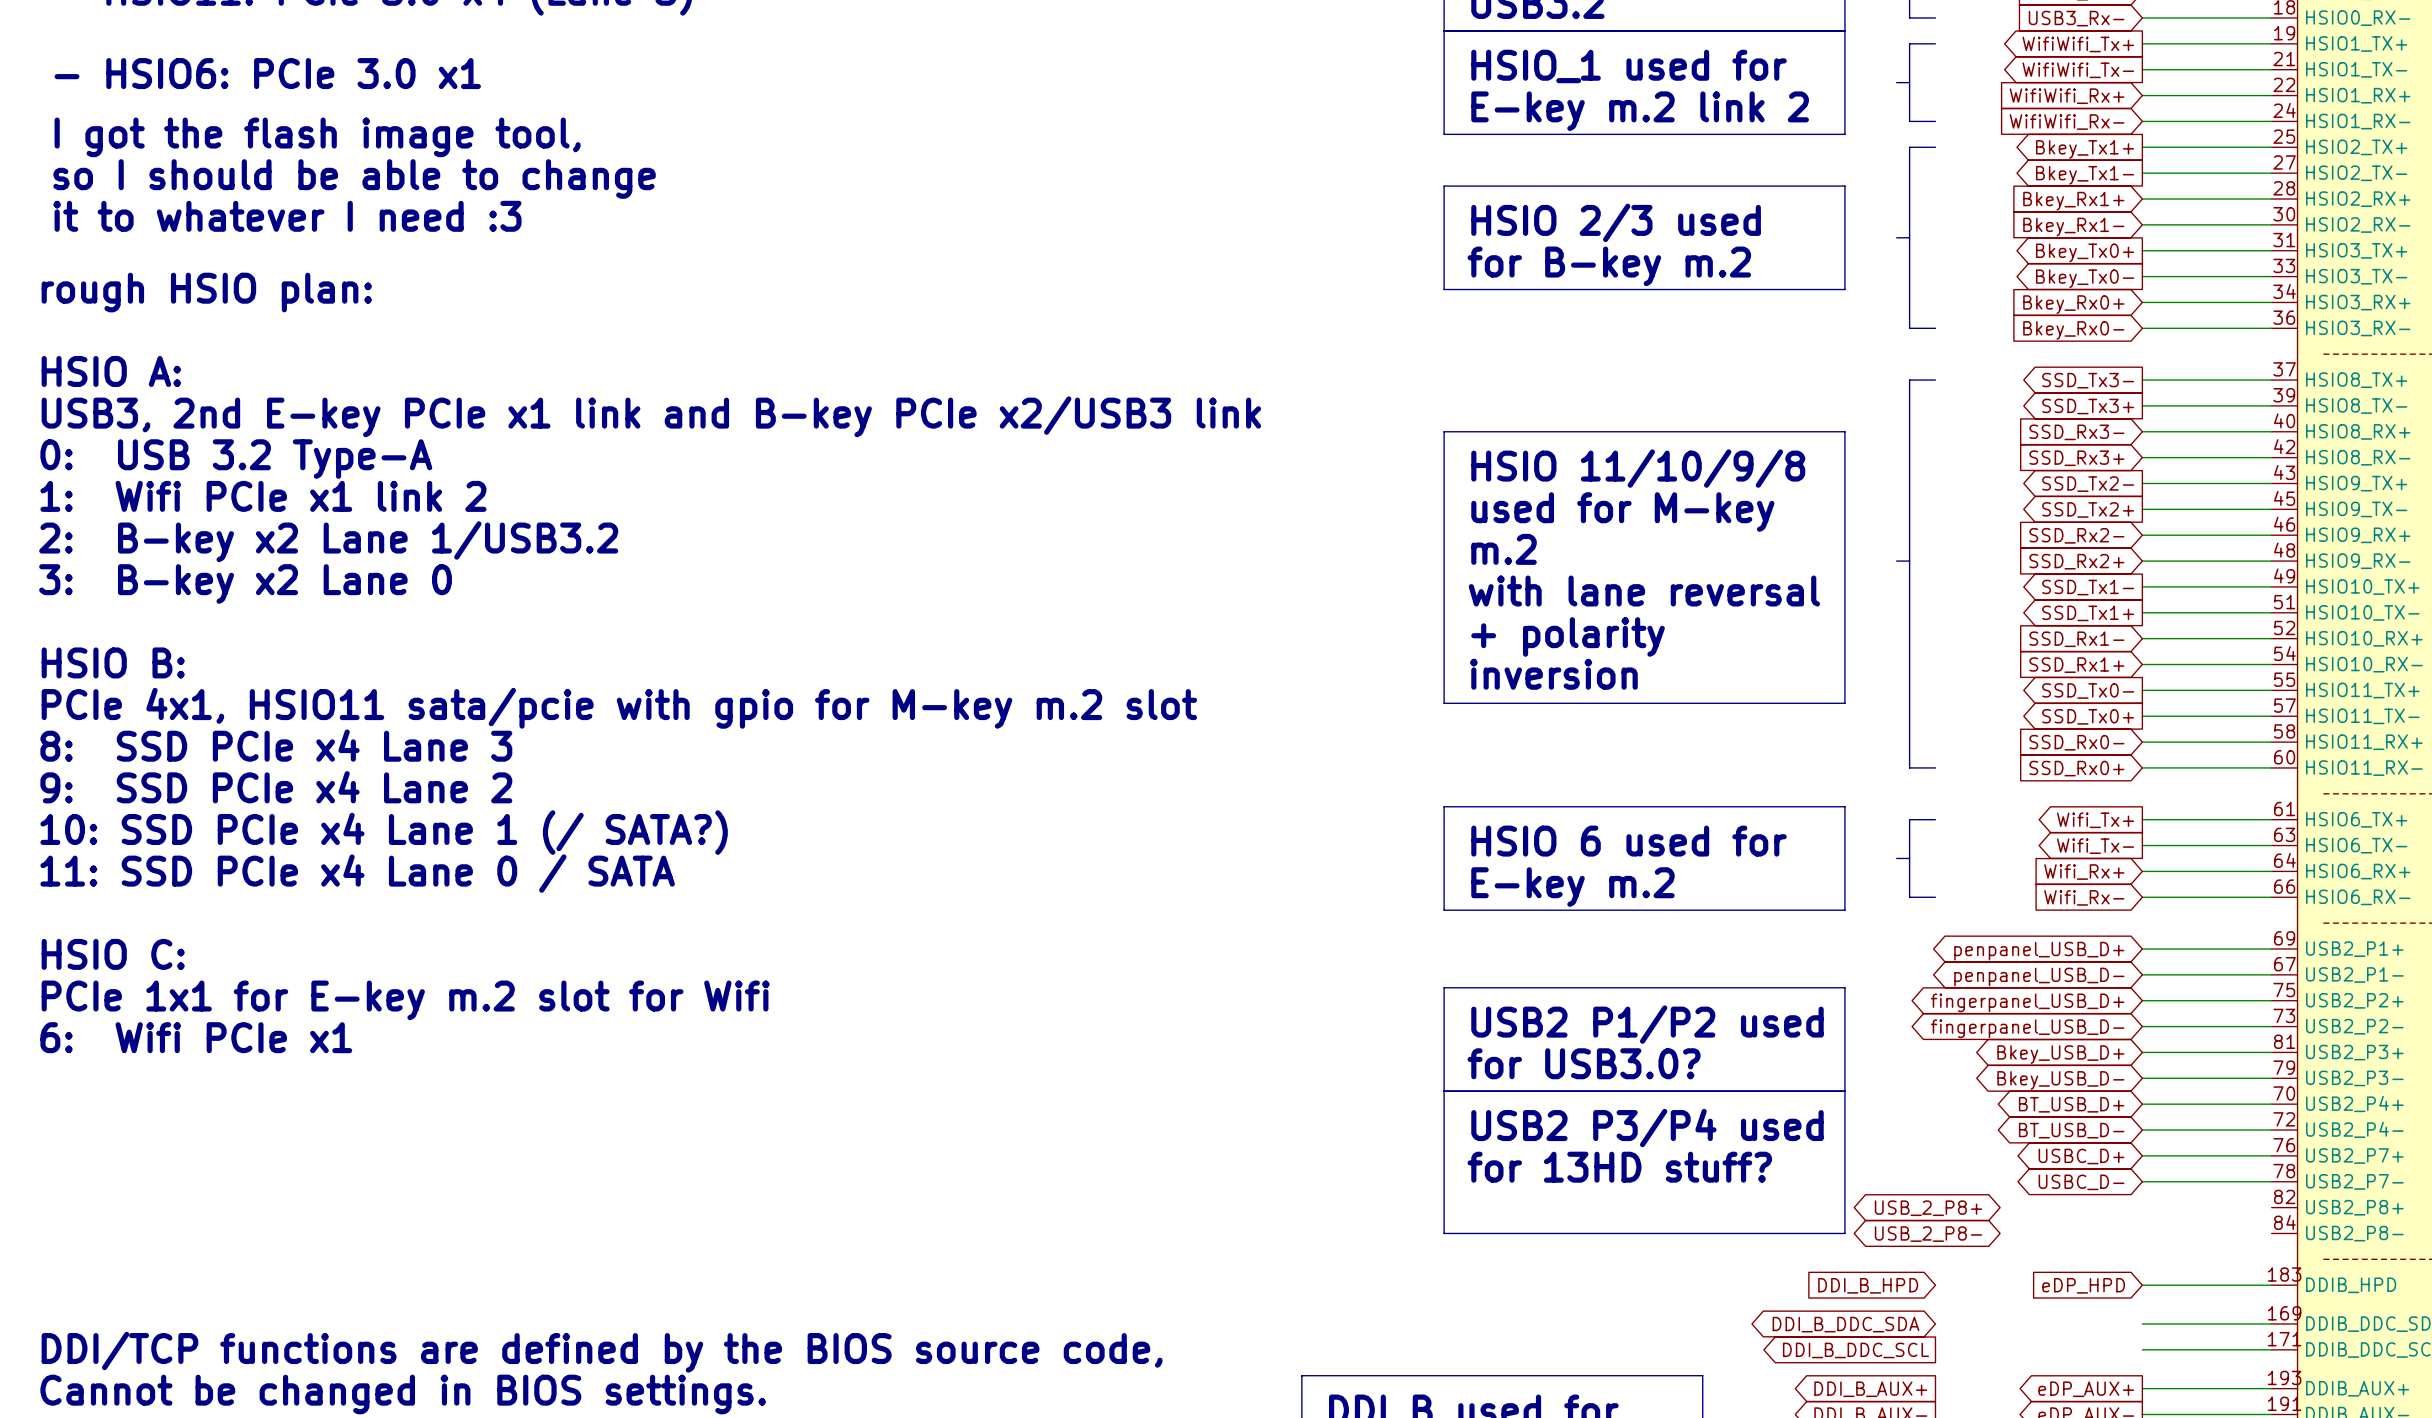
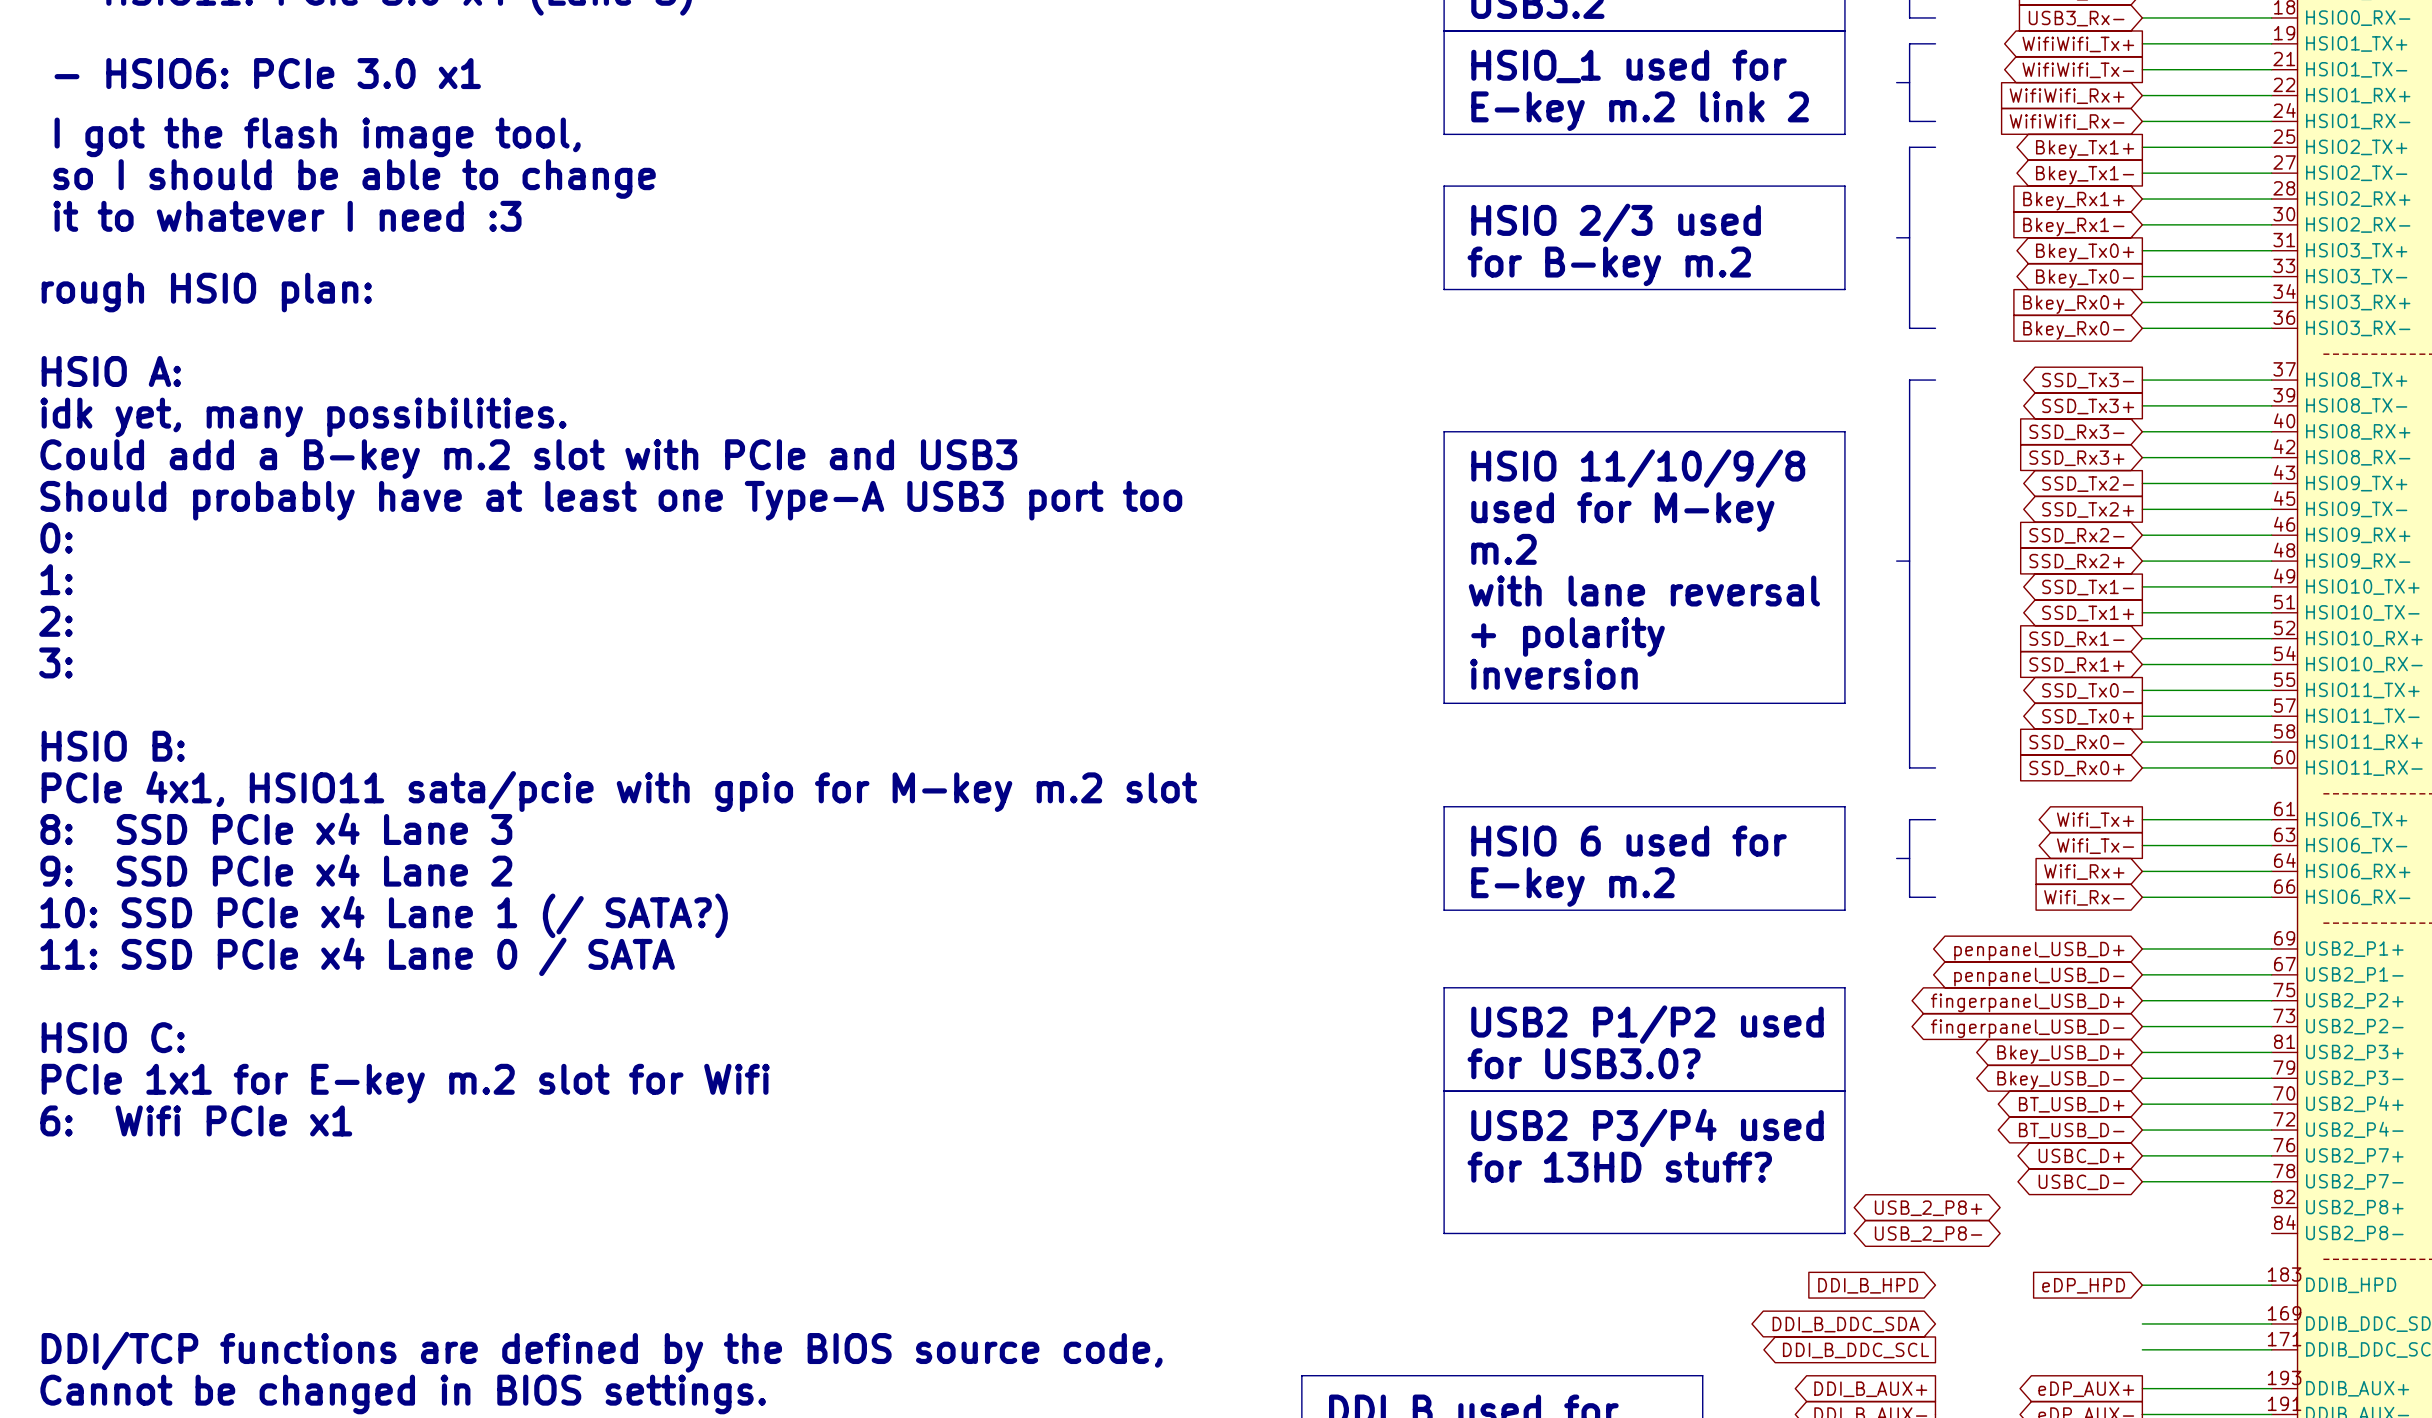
text: USB3, 2nd E-key PCIe x1 link and B-key PCIe x2/USB3 link (651, 416) -> idk yet, many possibilities. (303, 417)
text: 0: USB 3.2 Type-A (236, 459) -> Could add a B-key m.2 slot with PCIe and USB3 (528, 459)
text: 1: Wifi PCIe x1 link 2 (263, 496) -> Should probably have at least one Type-A USB3 port too (611, 500)
text: 2: B-key x2 Lane 1/USB3.2 (328, 541) -> 0: (56, 538)
text: 3: B-key x2 Lane 0 (245, 583) -> 1: (56, 579)
text: none -> 2: (55, 621)
text: HSIO B: (113, 662) -> 3: (55, 662)
text: PCIe 4x1, HSIO11 sata/pcie with gpio for M-key m.2 slot (619, 708) -> none
text: 8: SSD PCIe x4 Lane 3 (276, 745) -> HSIO B: (113, 746)
text: 9: SSD PCIe x4 Lane 2 (276, 787) -> PCIe 4x1, HSIO11 sata/pcie with gpio for M-key m.2 slot (619, 791)
text: 10: SSD PCIe x4 Lane 1 (/ SATA?) (384, 832) -> 8: SSD PCIe x4 Lane 3 (276, 828)
text: 11: SSD PCIe x4 Lane 0 / SATA (357, 873) -> 9: SSD PCIe x4 Lane 2 (276, 870)
text: none -> 10: SSD PCIe x4 Lane 1 (/ SATA?) (384, 915)
text: HSIO C: (113, 954) -> 11: SSD PCIe x4 Lane 0 / SATA (357, 956)
text position: PCIe 1x1 for E-key m.2 slot for Wifi (405, 1000) -> PCIe 1x1 for E-key m.2 slot for Wifi (405, 1083)
text: 6: Wifi PCIe x1 (196, 1037) -> HSIO C: (113, 1037)
text: none -> 6: Wifi PCIe x1 (196, 1120)

